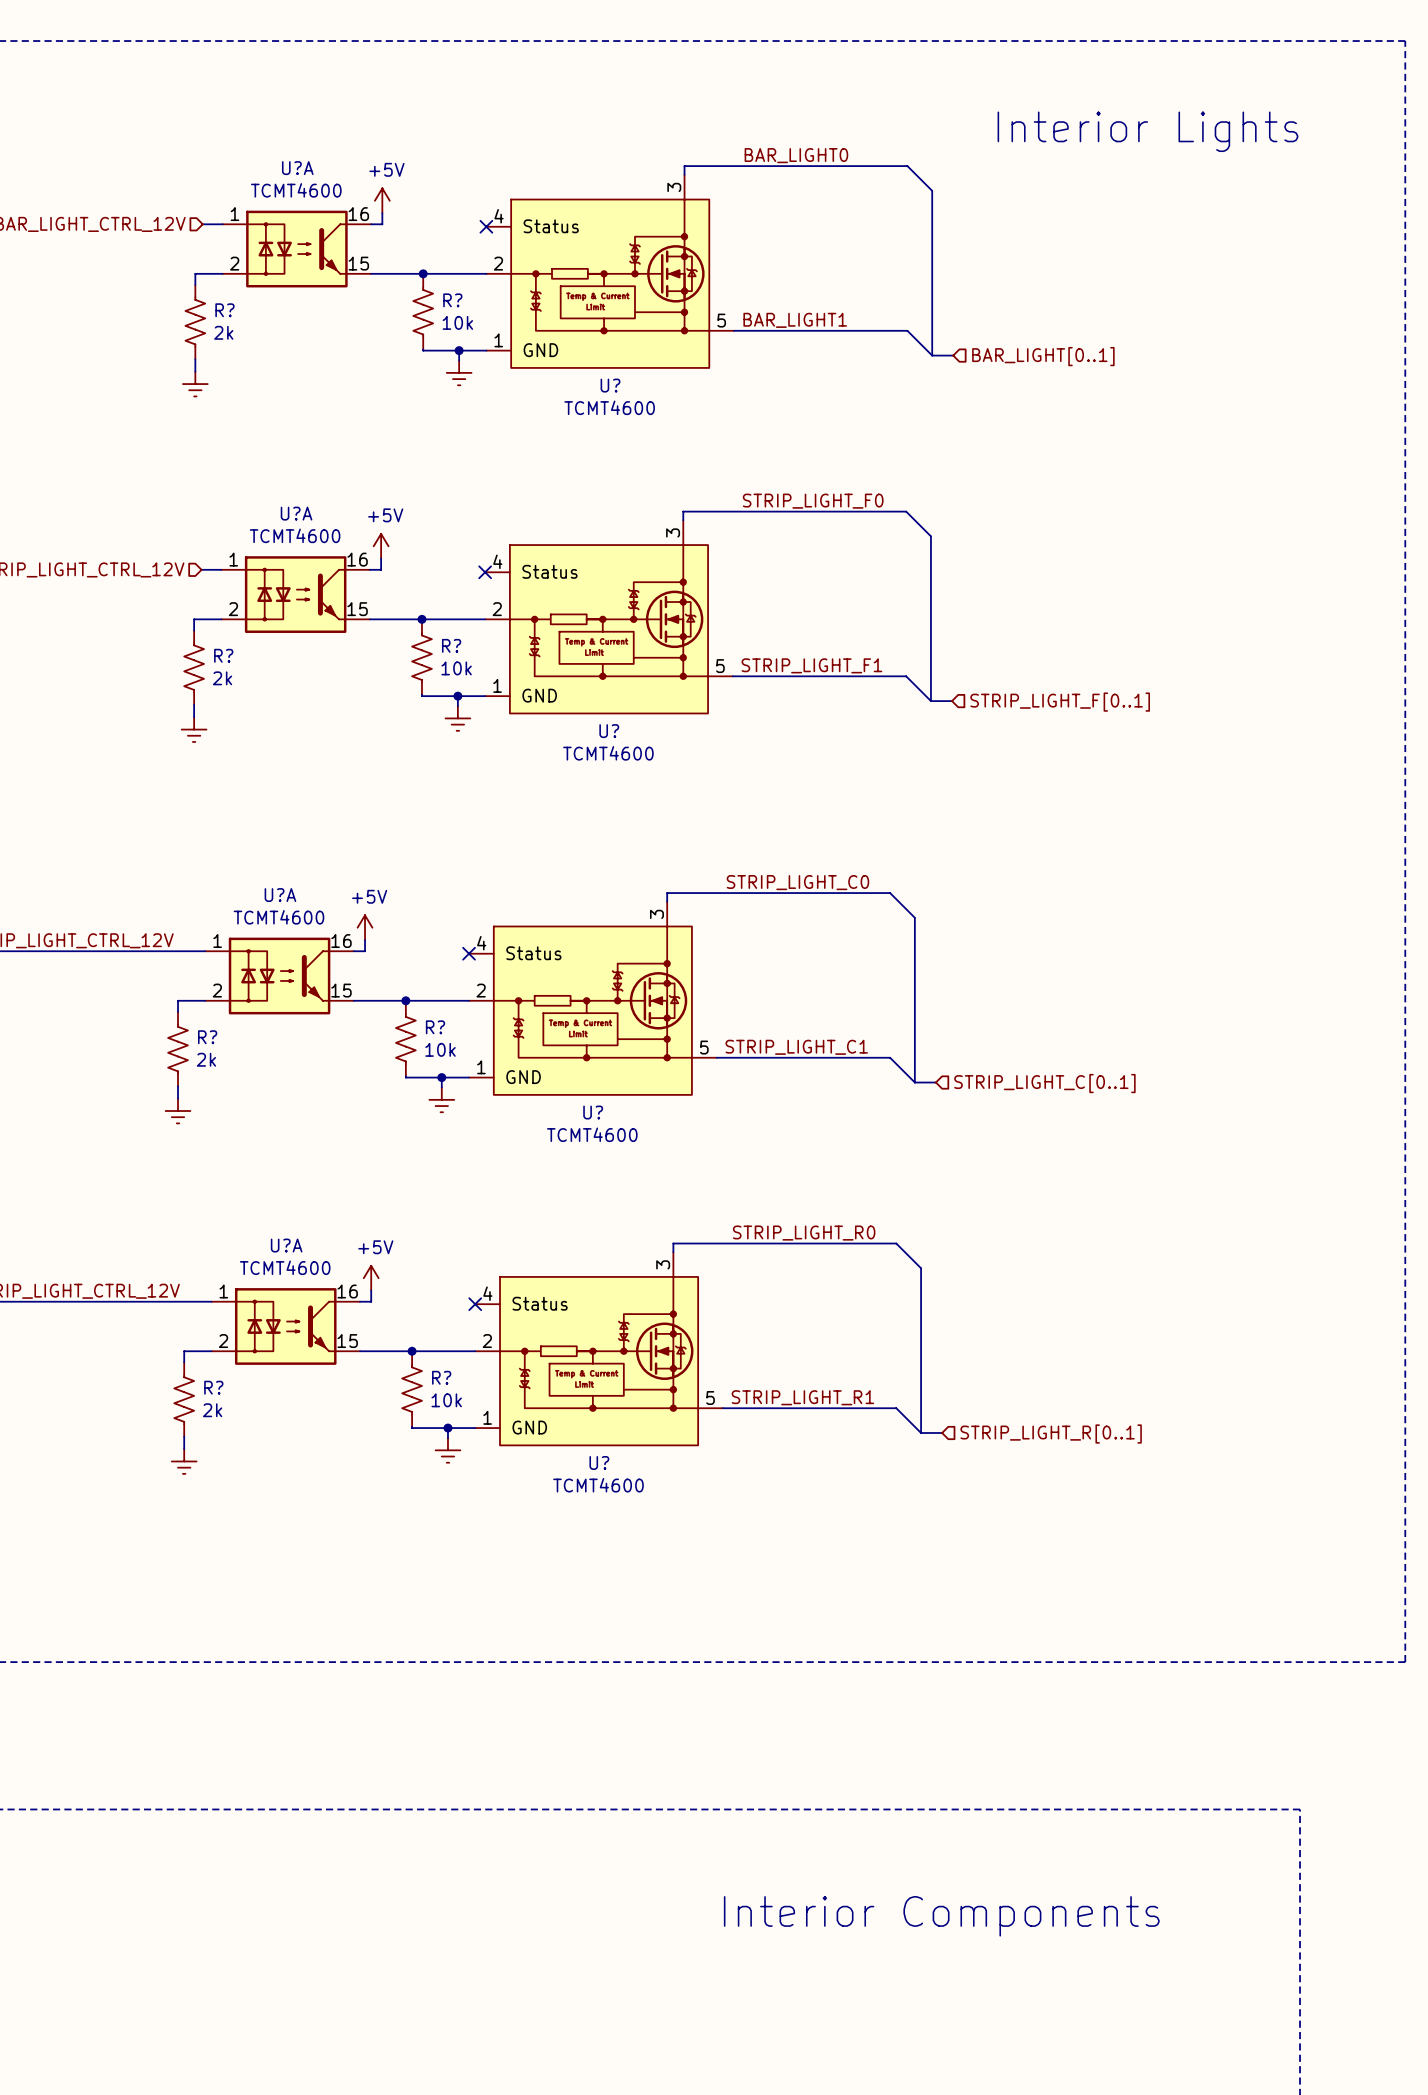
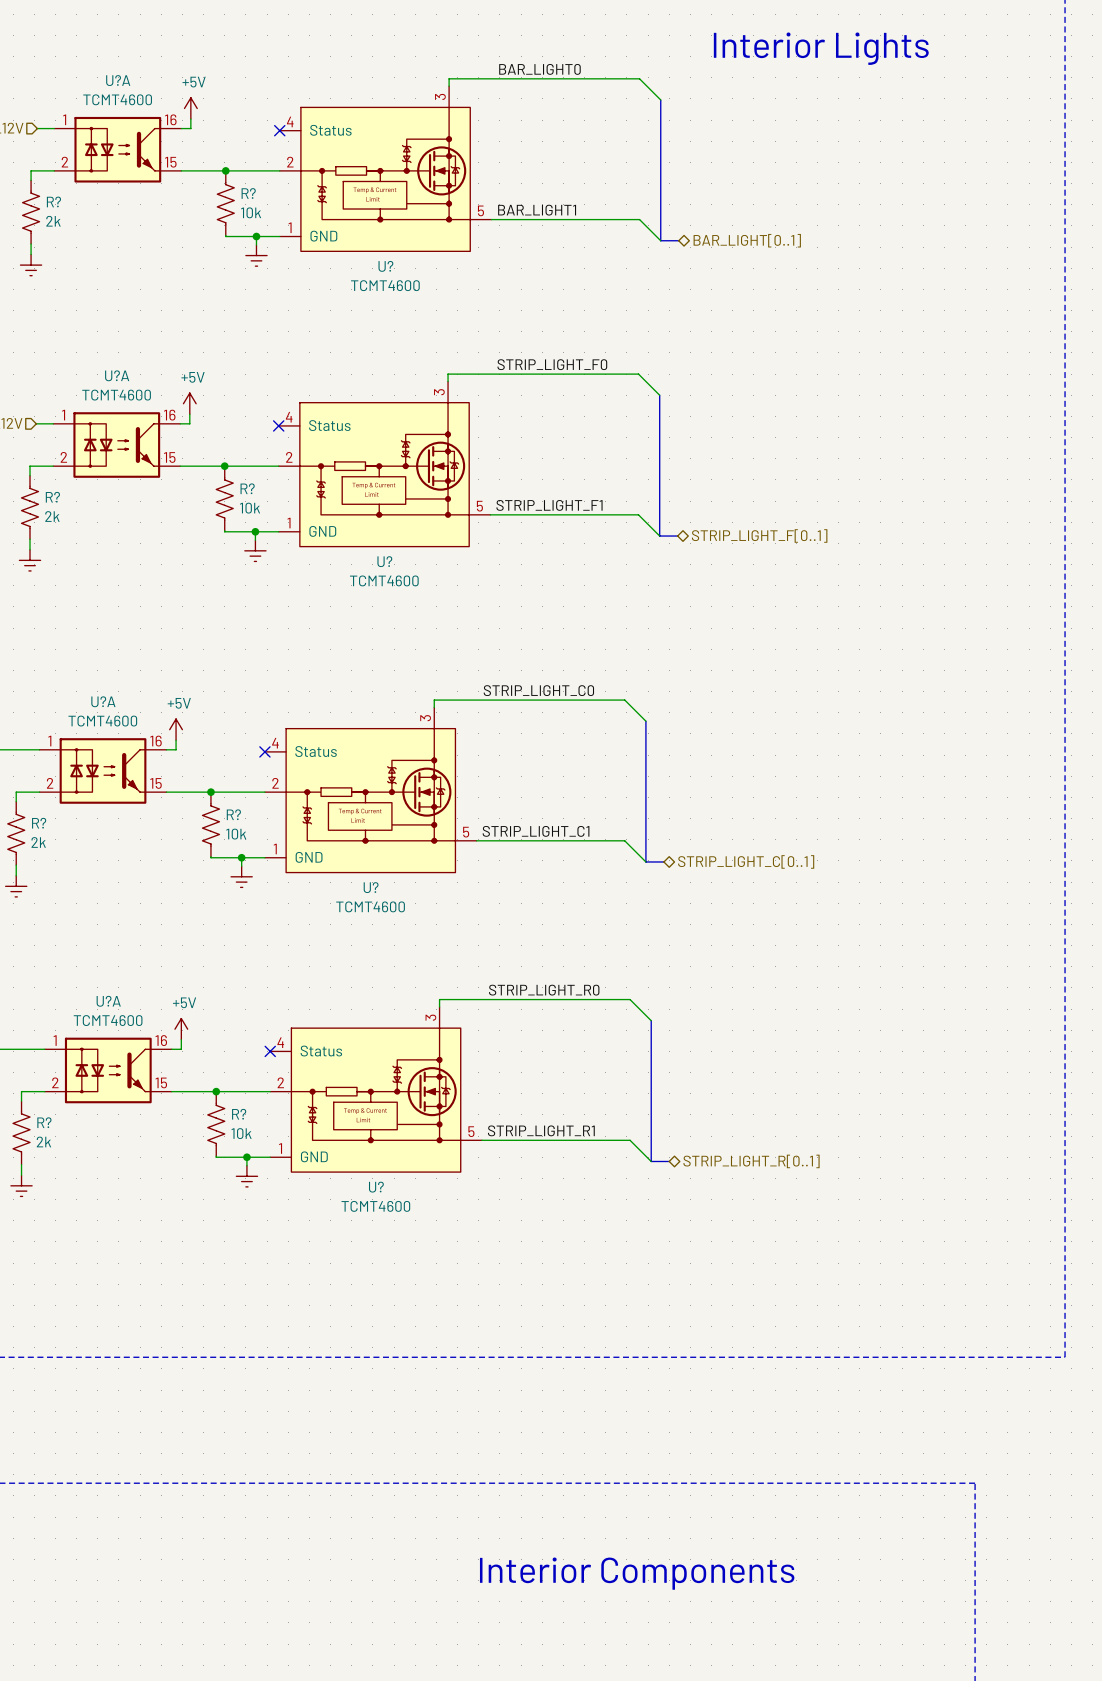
hierarchical label shape: input (1043, 356) -> bidirectional (747, 240)
hierarchical label shape: input (1060, 702) -> bidirectional (759, 535)
hierarchical label shape: input (1044, 1083) -> bidirectional (746, 861)
hierarchical label shape: input (1051, 1434) -> bidirectional (751, 1161)

